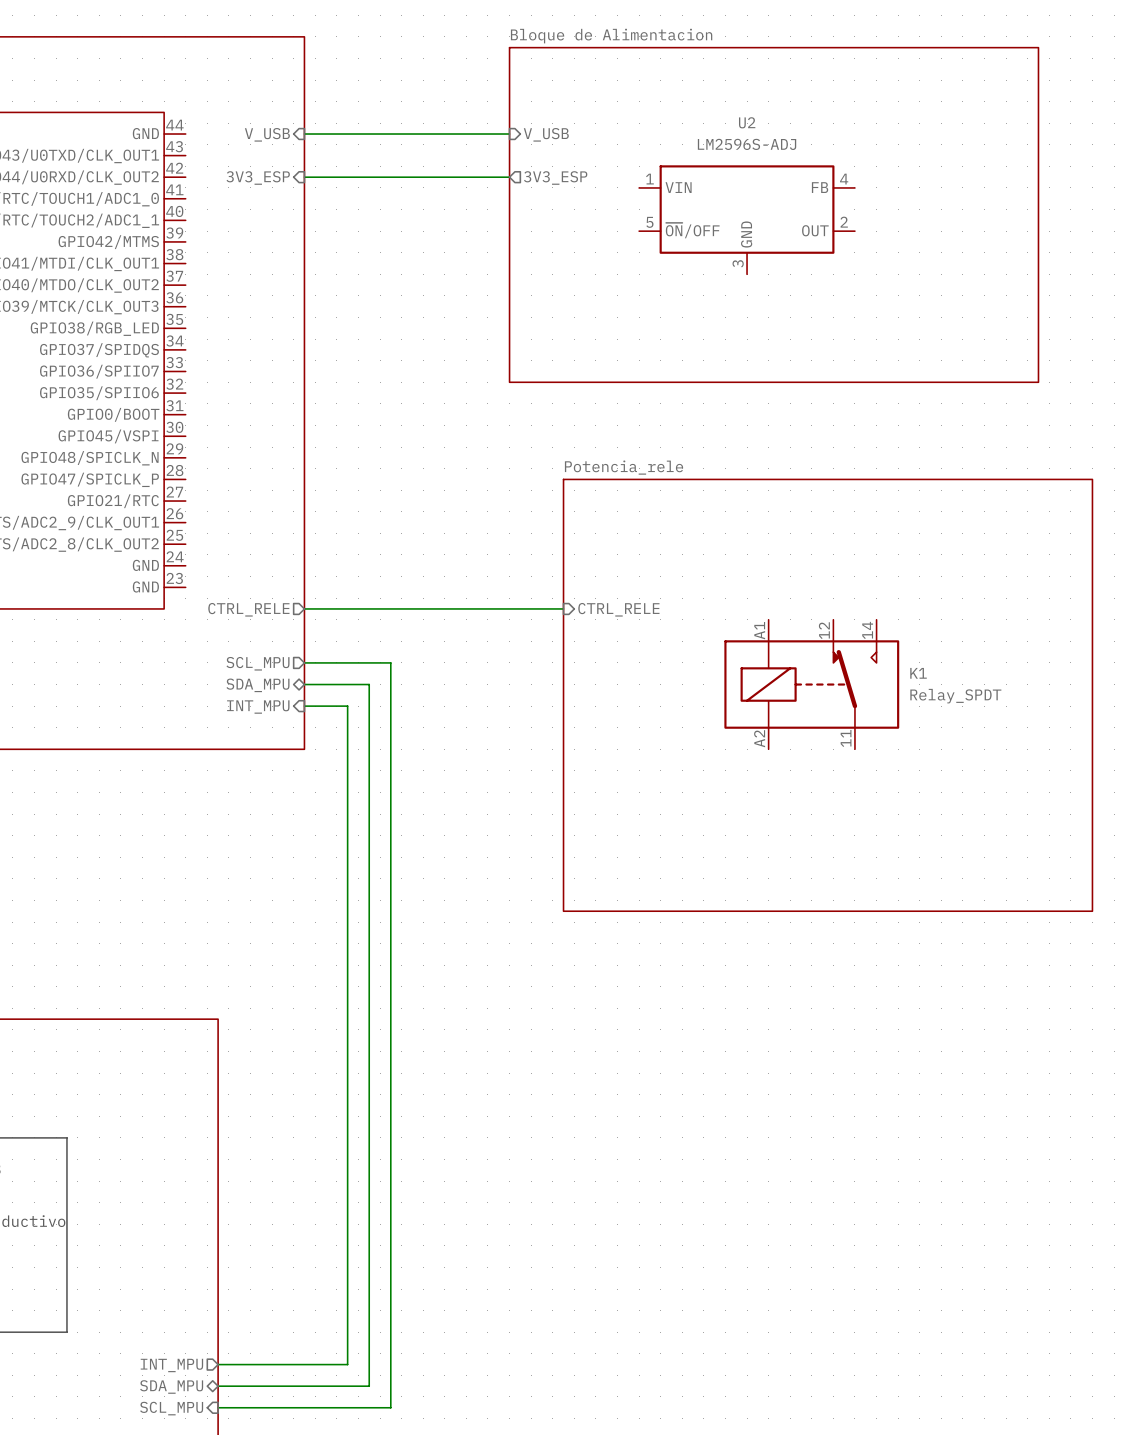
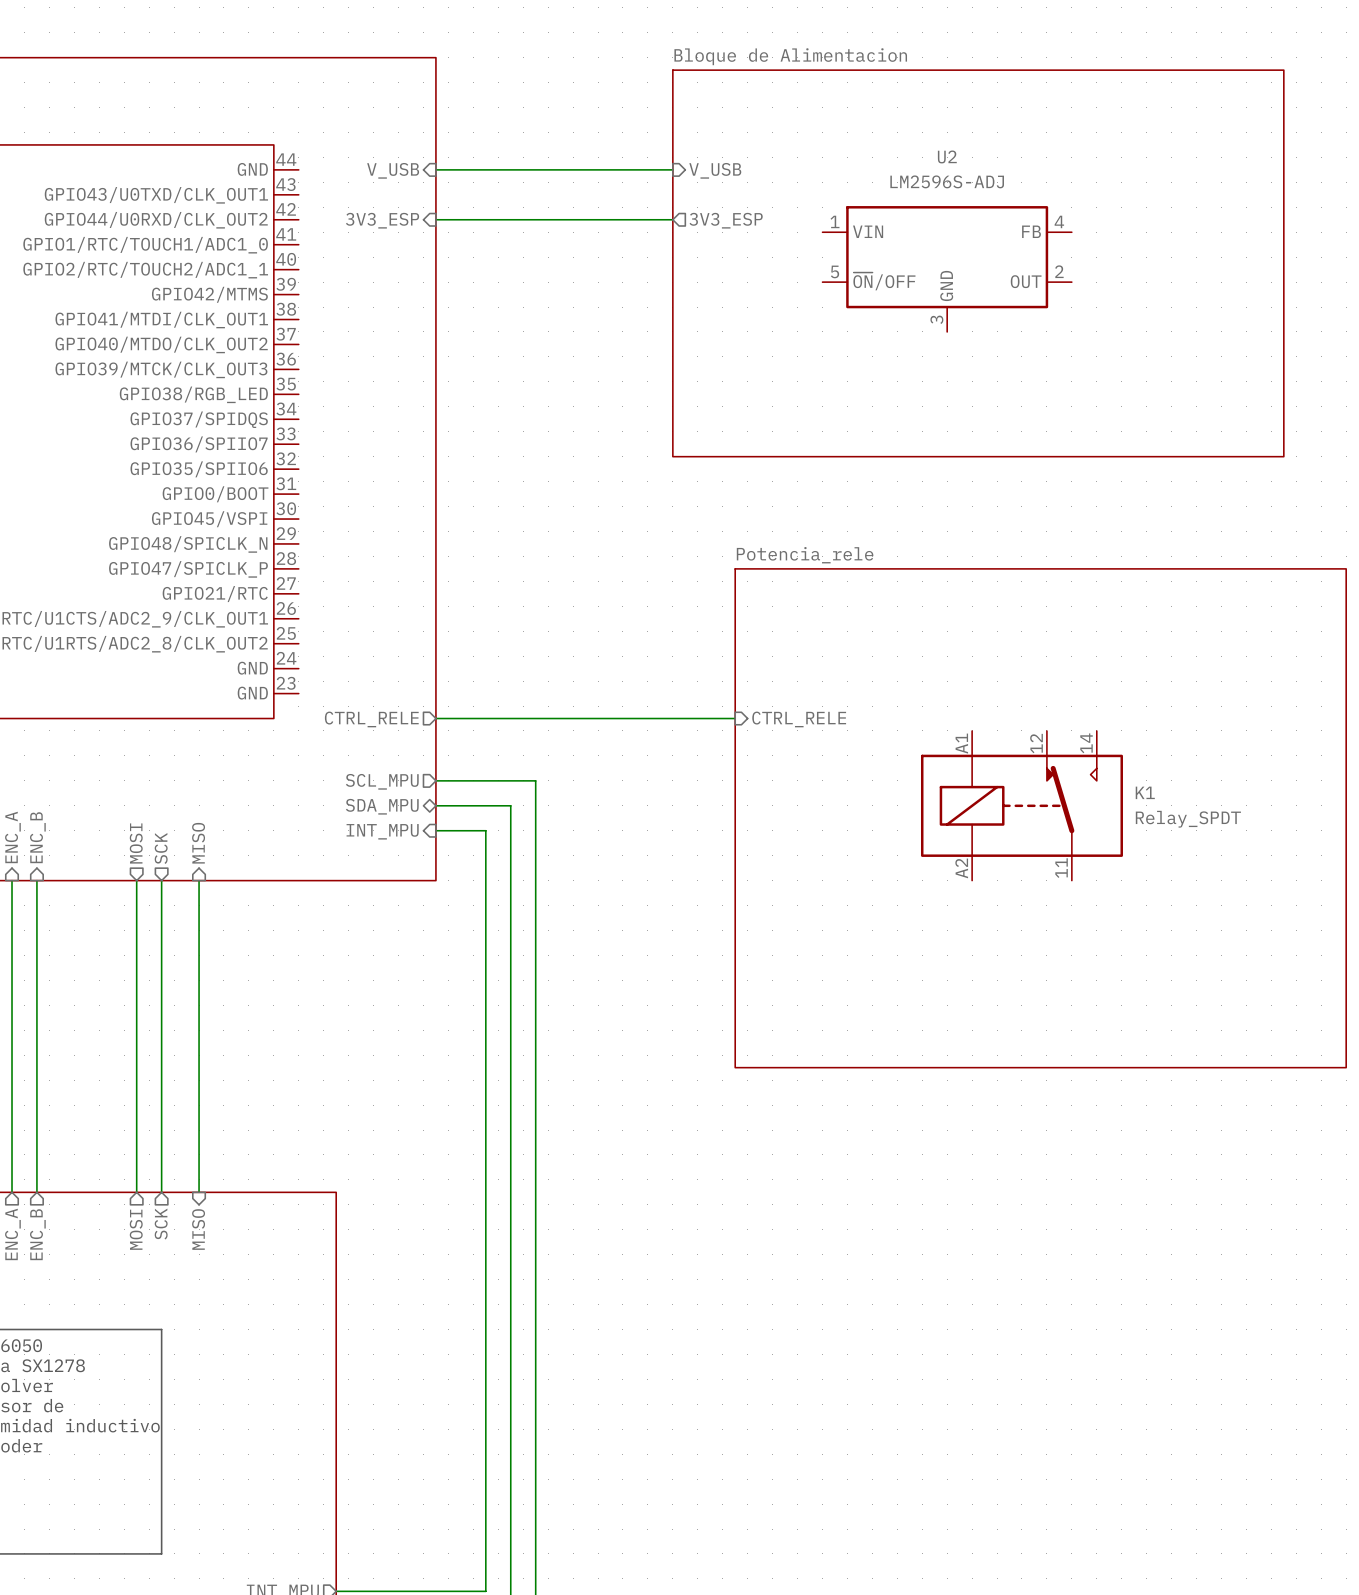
sheet pin: none -> MISO (198, 843)
sheet pin: none -> MOSI (136, 843)
sheet pin: none -> SCK (161, 848)
wire: none -> (136, 880) (136, 1192)
wire: none -> (161, 880) (161, 1192)
wire: none -> (199, 880) (199, 1192)
sheet pin: none -> SCK (161, 1224)
sheet pin: none -> MOSI (136, 1229)
sheet pin: none -> MISO (198, 1229)

